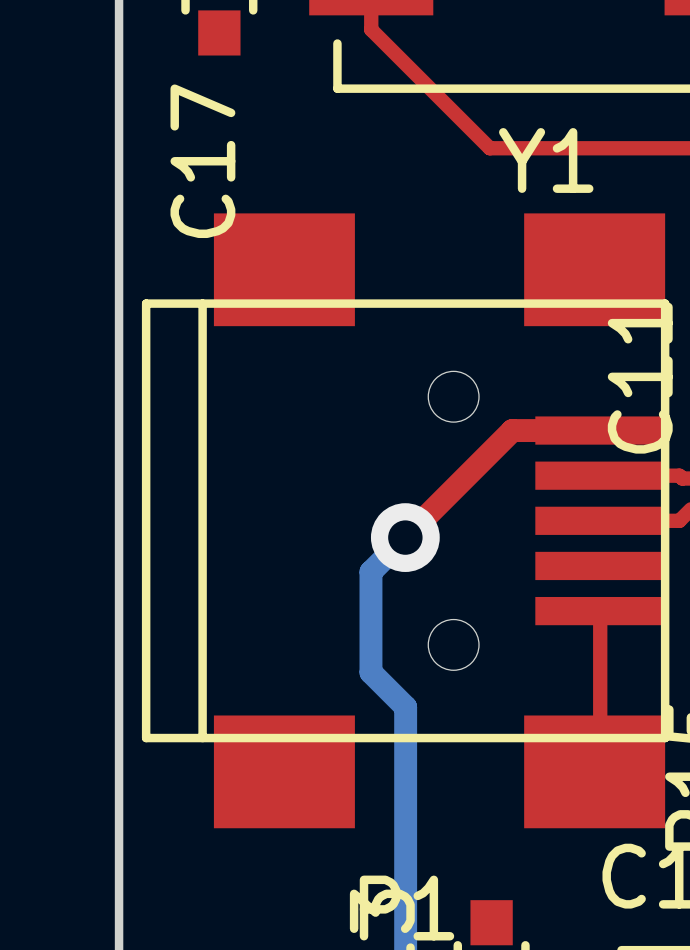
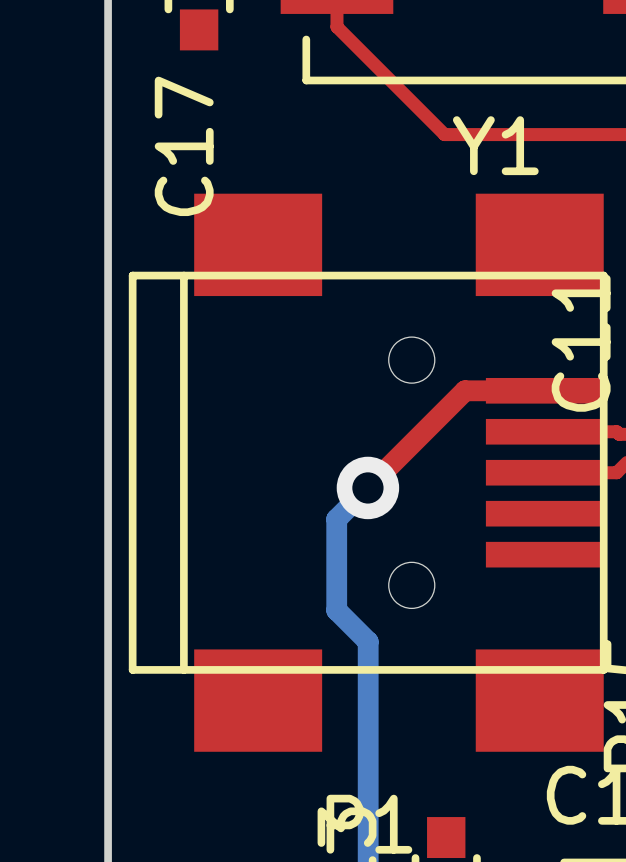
top track: (600, 611) (600, 766) (594, 771) -> none

